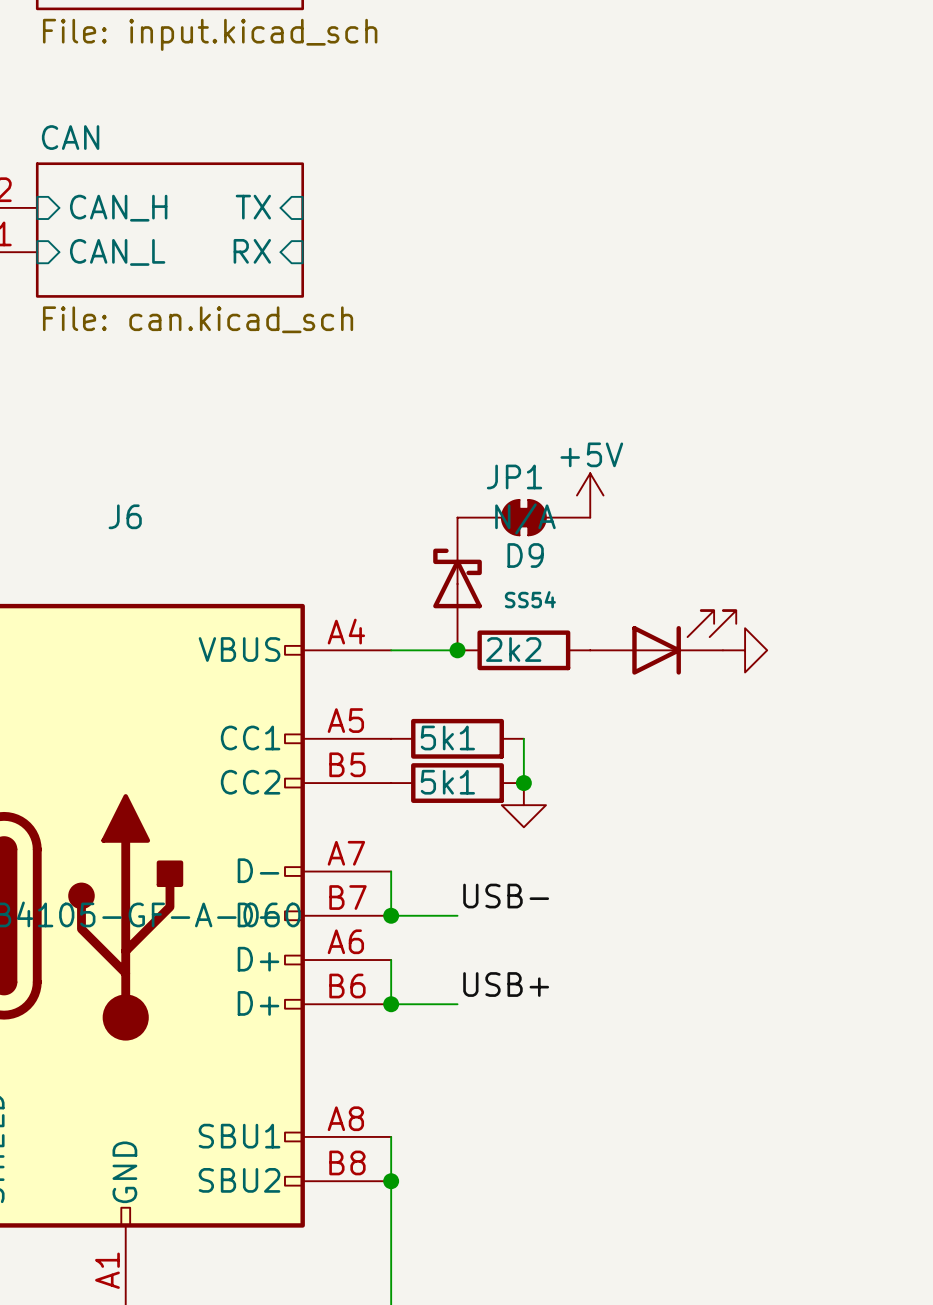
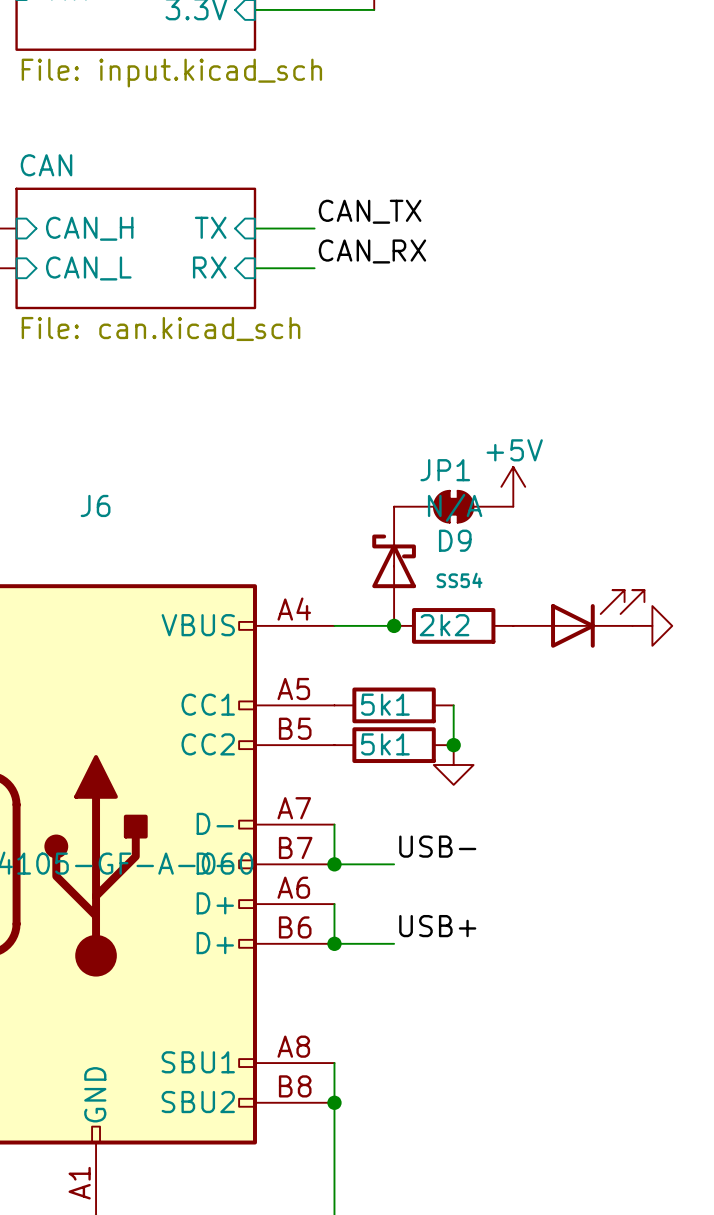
label: none -> CAN_TX (370, 211)
wire: none -> (254, 228) (314, 228)
label: none -> CAN_RX (372, 251)
wire: none -> (254, 268) (314, 268)

